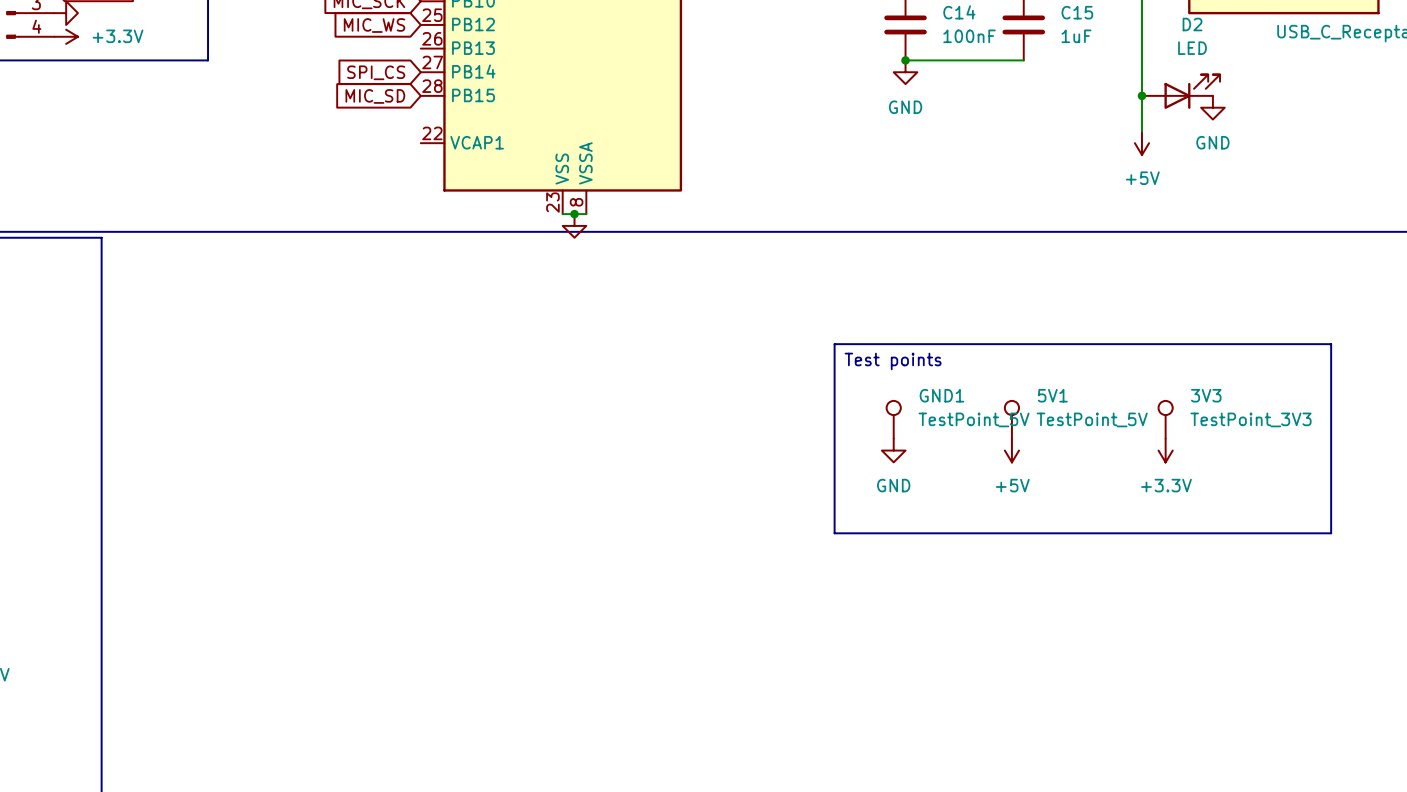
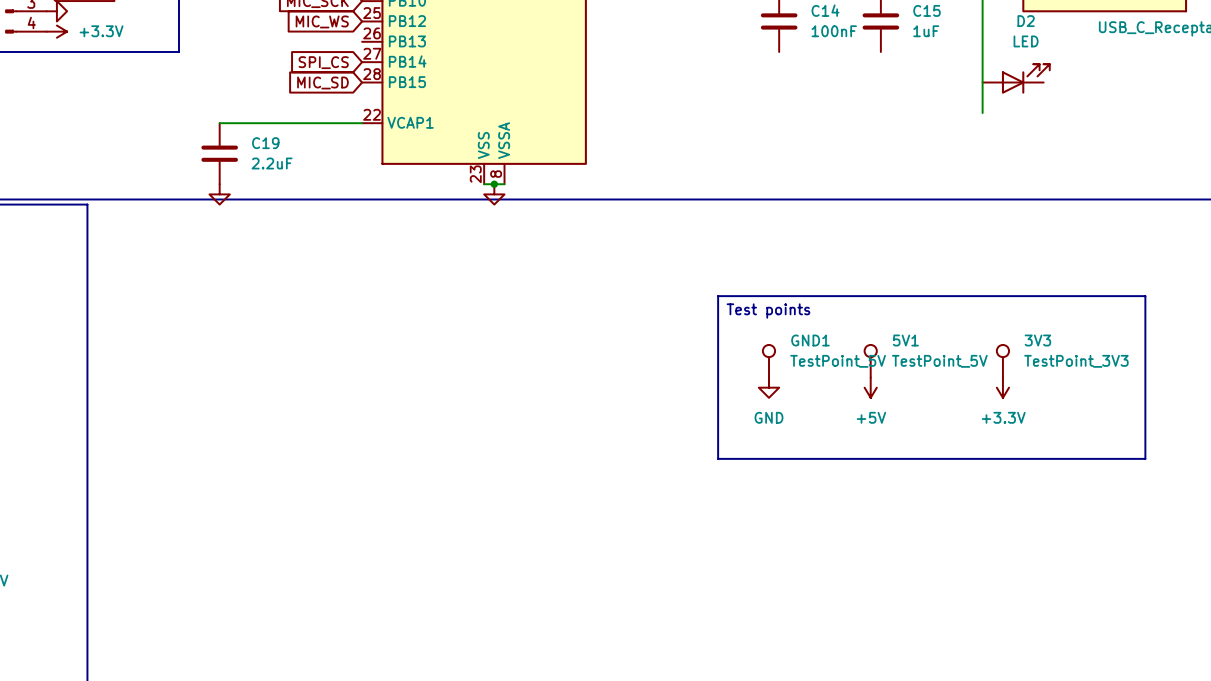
wire: (905, 60) (1023, 60) -> none
junction: (905, 60) -> none
power symbol: GND (905, 72) -> none
junction: (1141, 95) -> none
power symbol: GND (1212, 107) -> none
wire: none -> (219, 123) (362, 123)
power symbol: +5V (1141, 143) -> none
C19: none -> 2.2uF (219, 153)
power symbol: none -> (219, 194)

